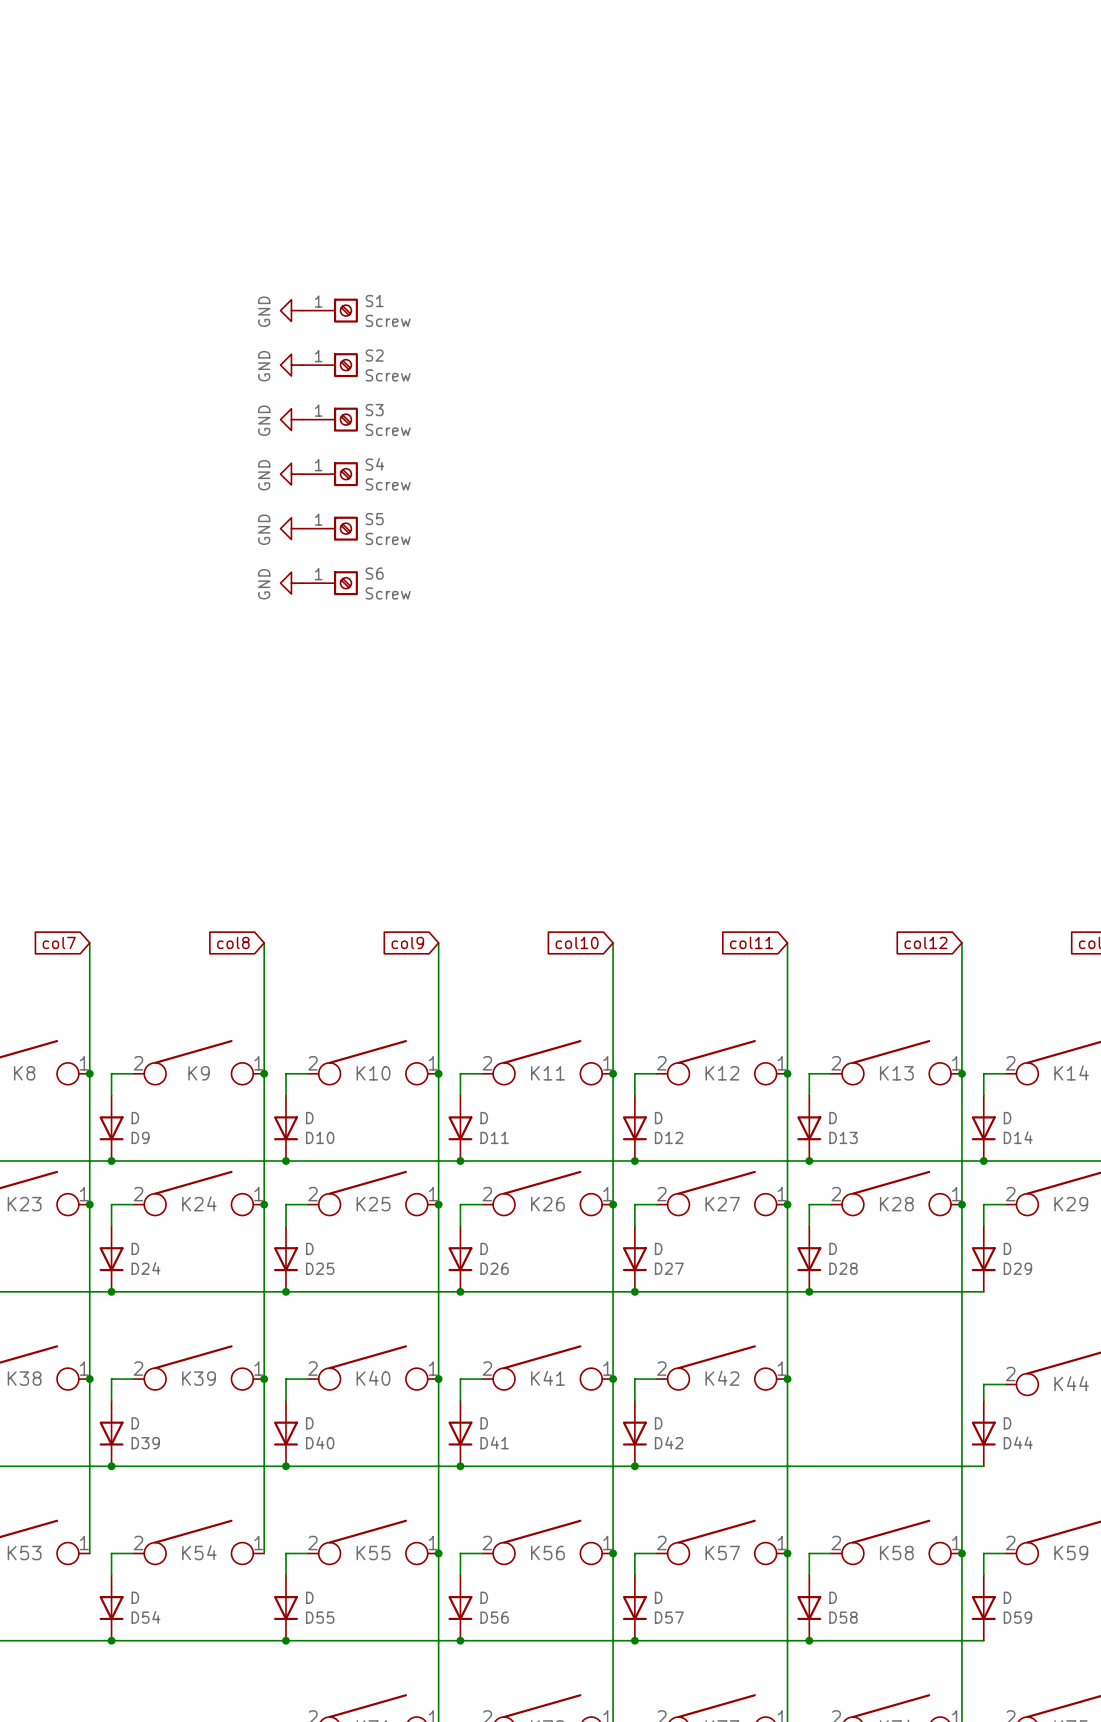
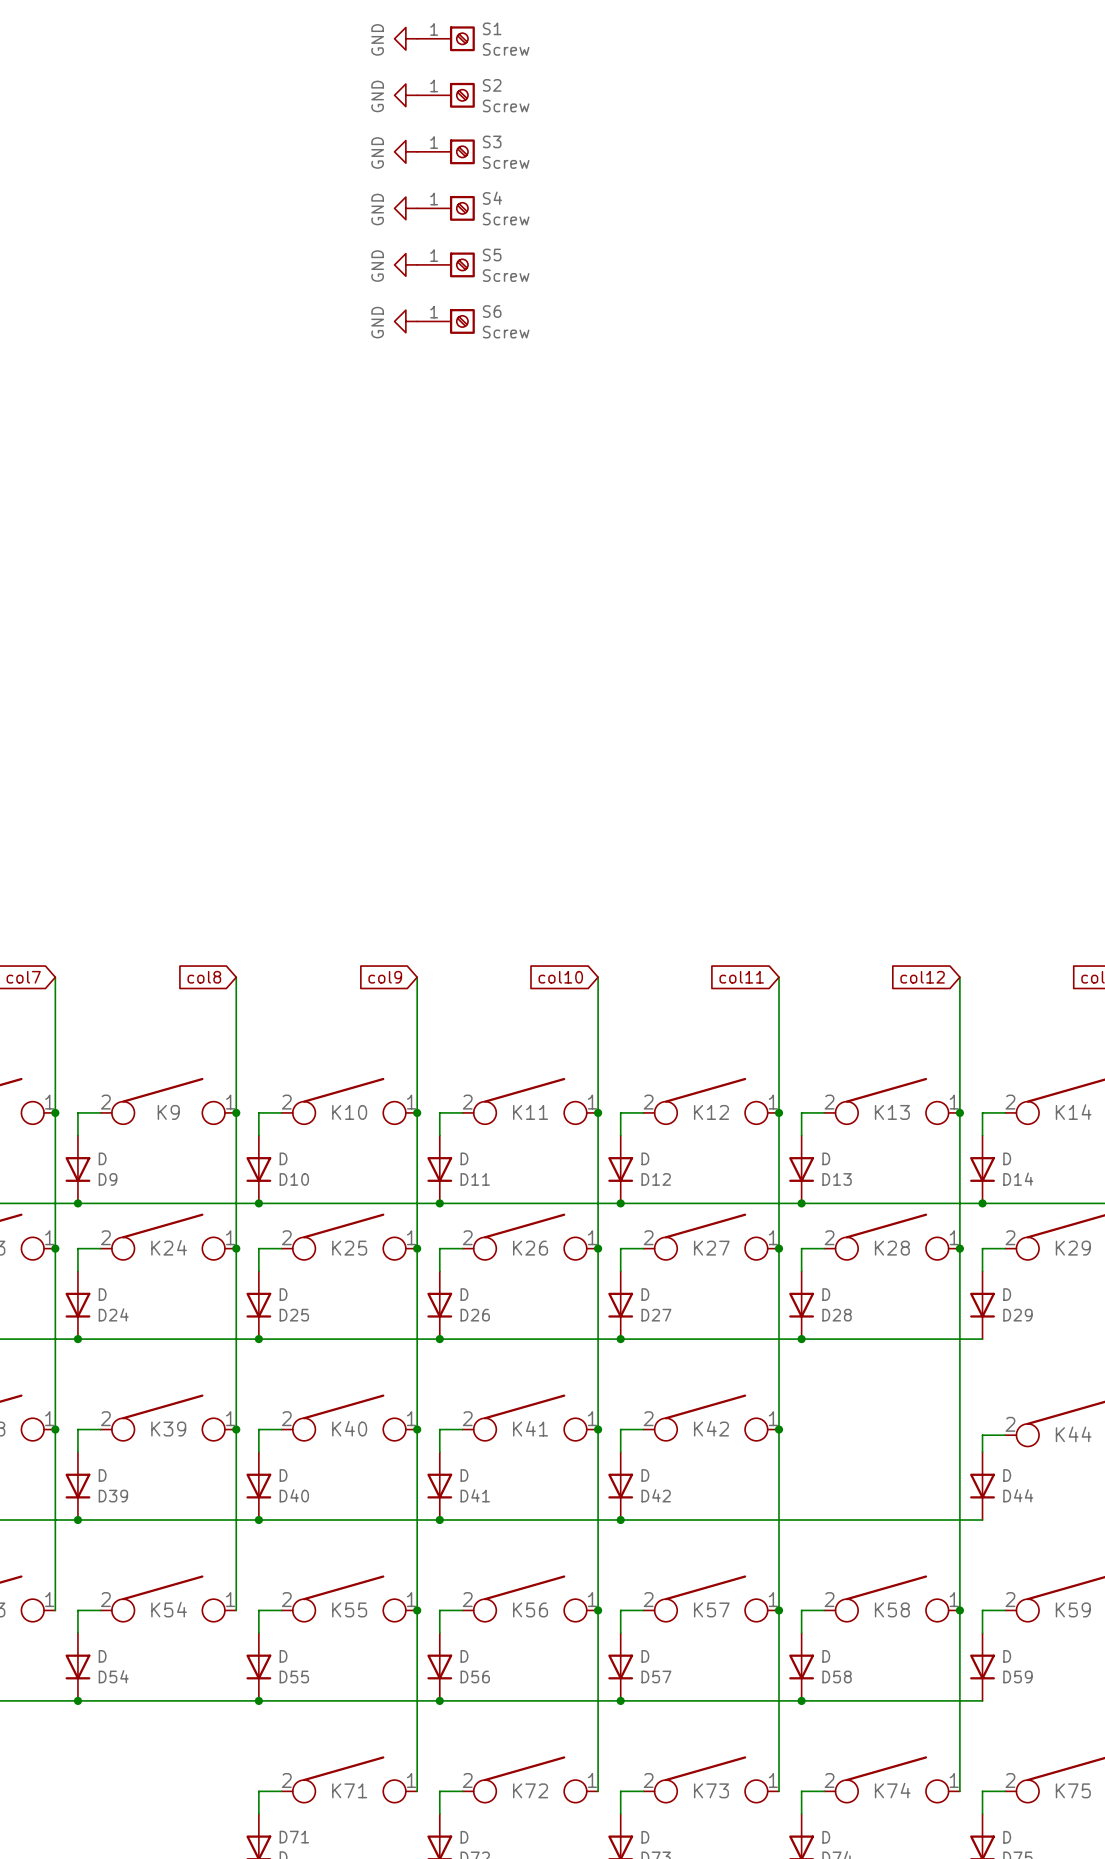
power symbol: none -> GND (405, 38)
power symbol: none -> GND (405, 95)
power symbol: none -> GND (405, 151)
power symbol: none -> GND (405, 208)
power symbol: none -> GND (405, 264)
power symbol: GND (291, 310) -> none
S1 position: (330, 310) -> (446, 38)
power symbol: none -> GND (405, 321)
power symbol: GND (291, 365) -> none
S2 position: (330, 365) -> (446, 95)
power symbol: GND (291, 419) -> none
S3 position: (330, 419) -> (446, 151)
power symbol: GND (291, 474) -> none
S4 position: (330, 474) -> (446, 208)
power symbol: GND (291, 528) -> none
S5 position: (330, 528) -> (446, 264)
power symbol: GND (291, 583) -> none
S6 position: (330, 583) -> (446, 321)

